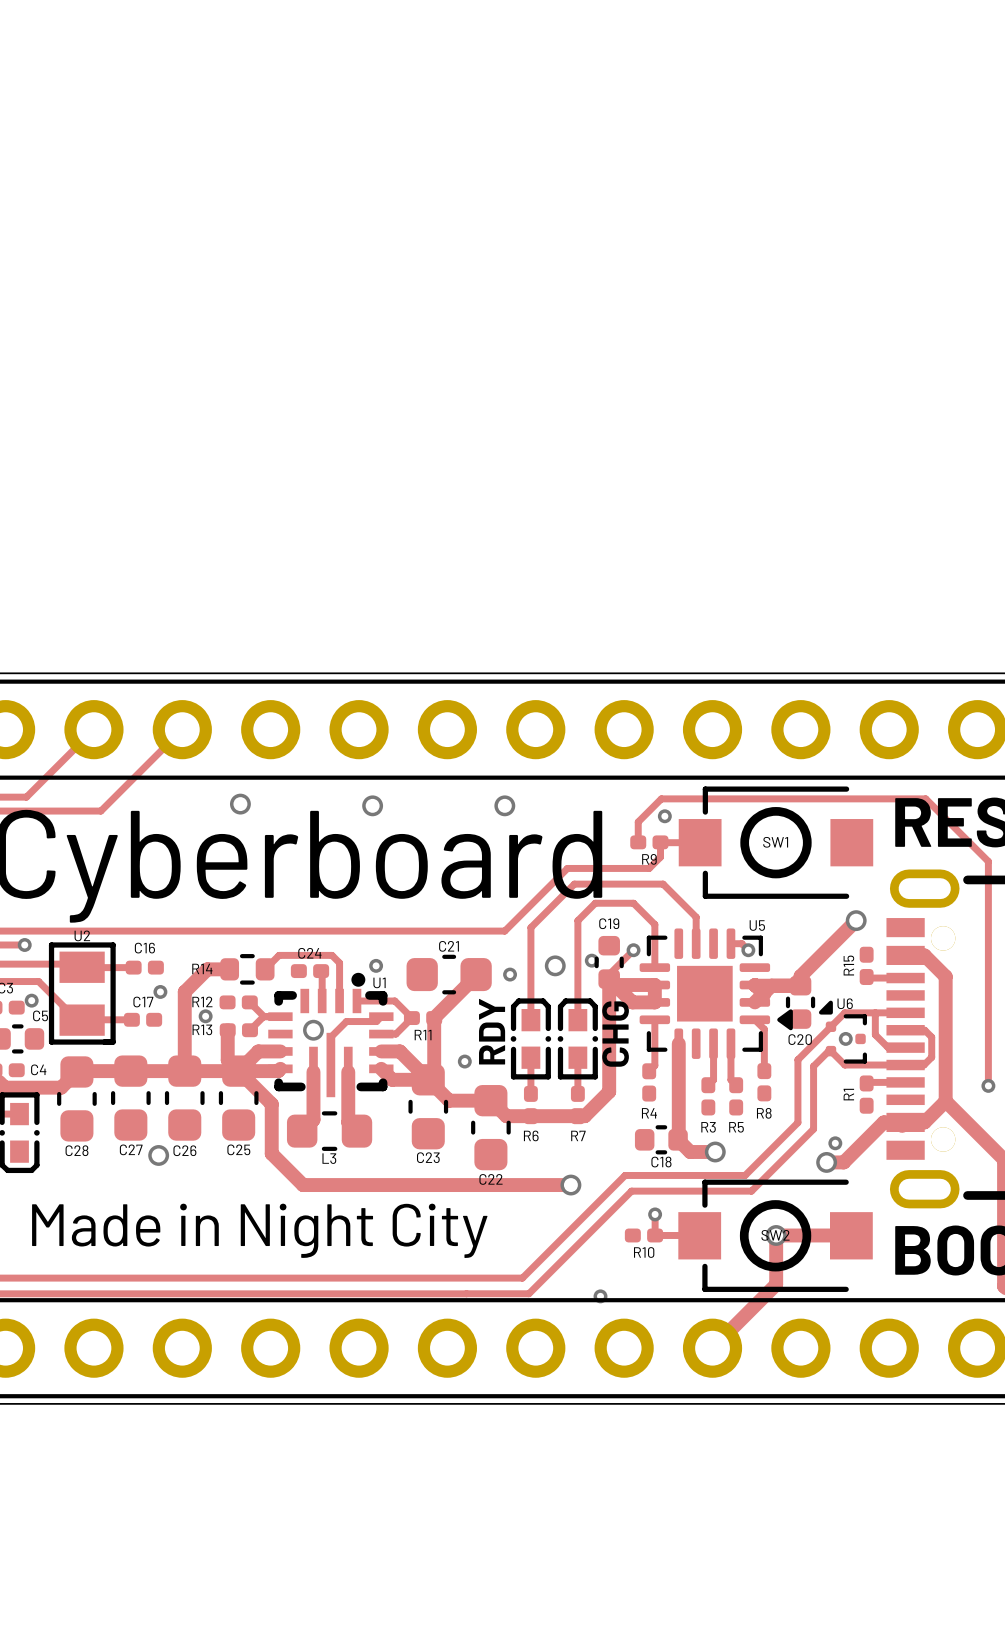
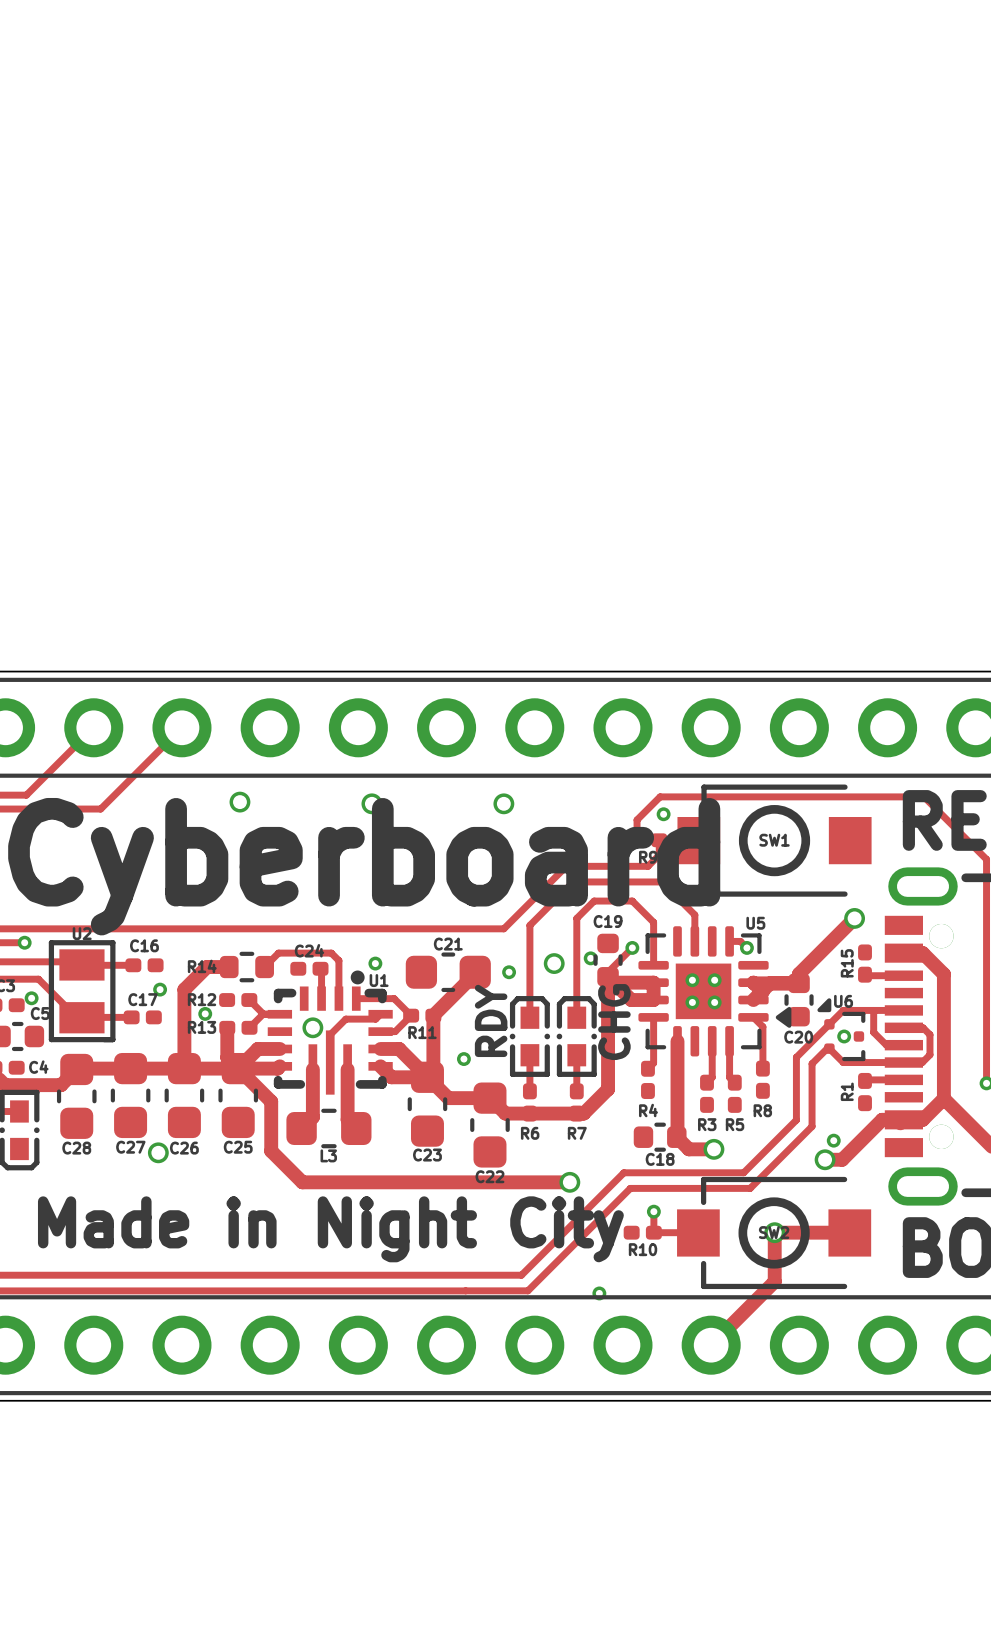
via: none -> (692, 980)
via: none -> (714, 980)
via: none -> (692, 1002)
via: none -> (714, 1002)

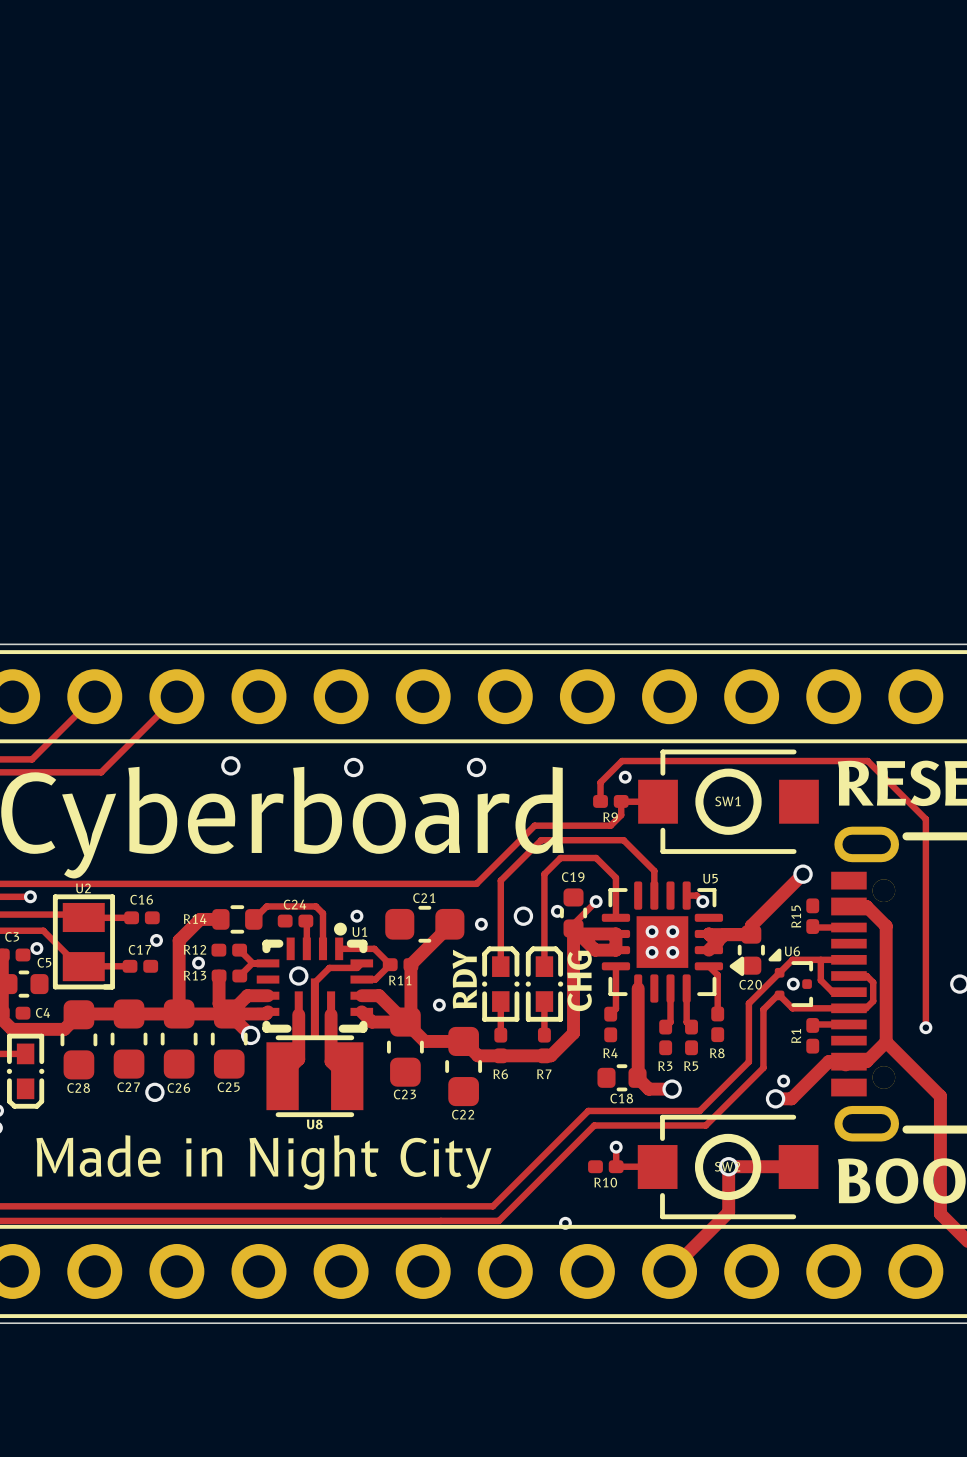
track: (261, 1091) (271, 1101) (271, 1151) (302, 1182) (569, 1182) -> none
via: none -> (250, 1035)
L3: (328, 1128) -> none
U8: none -> (314, 1076)
via: (569, 1182) -> none

